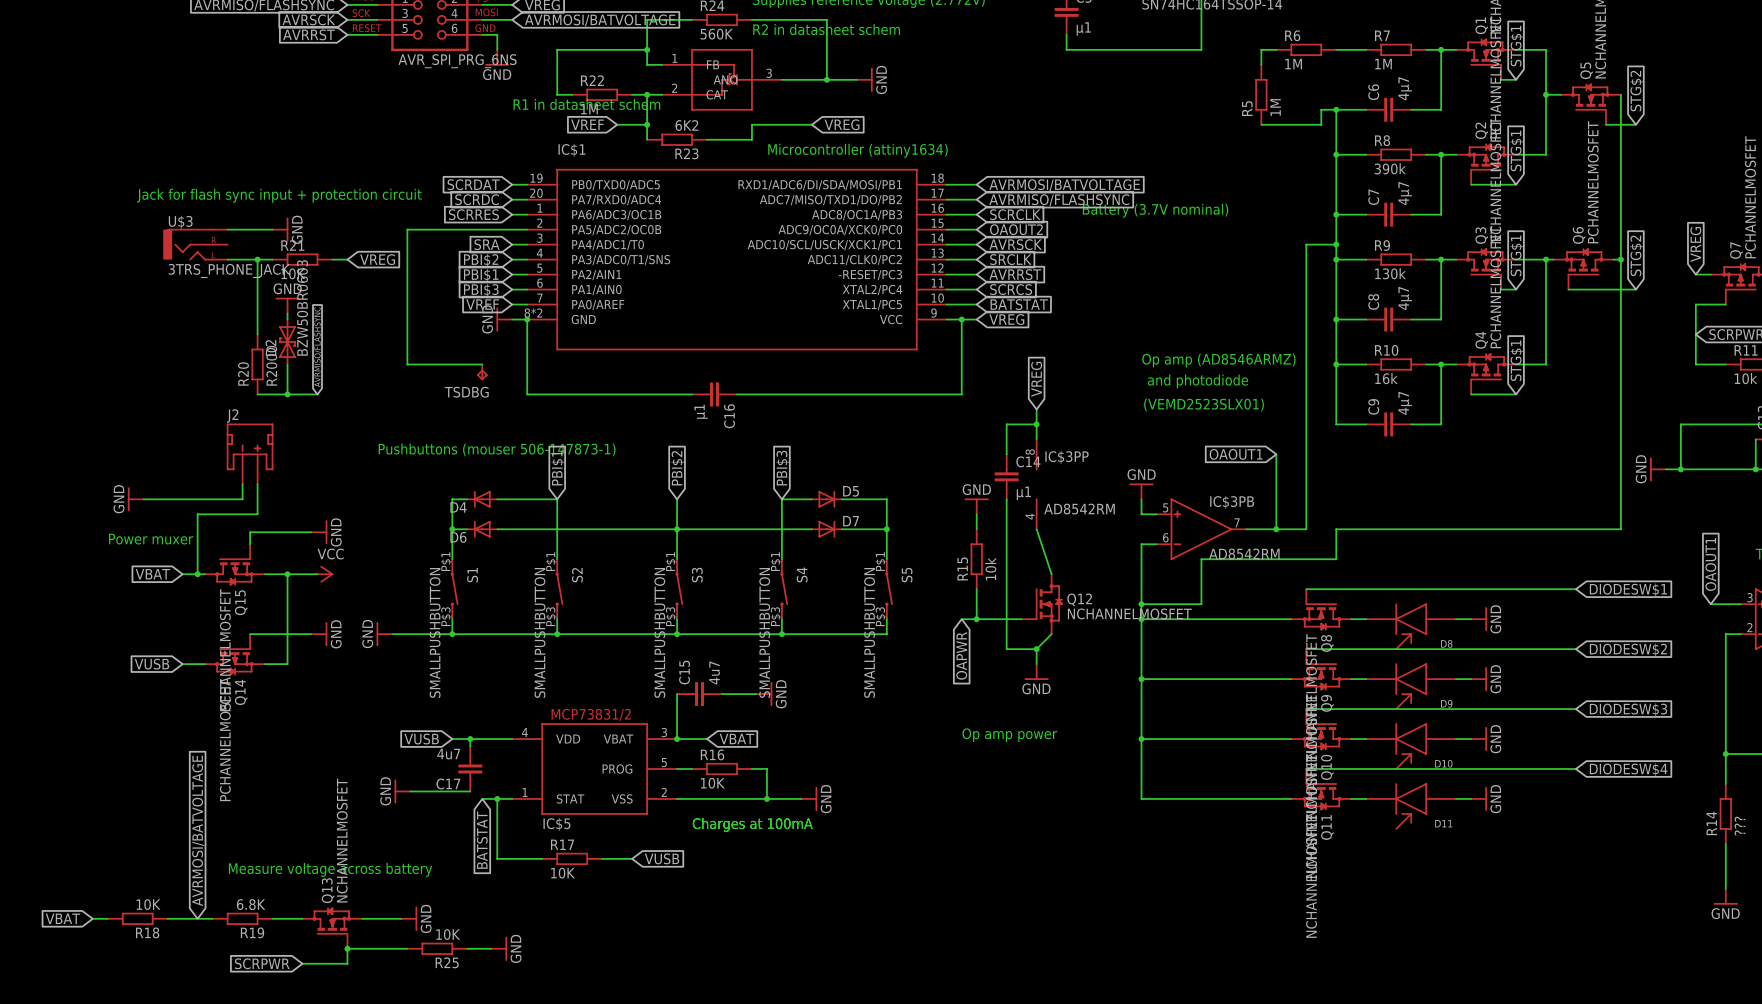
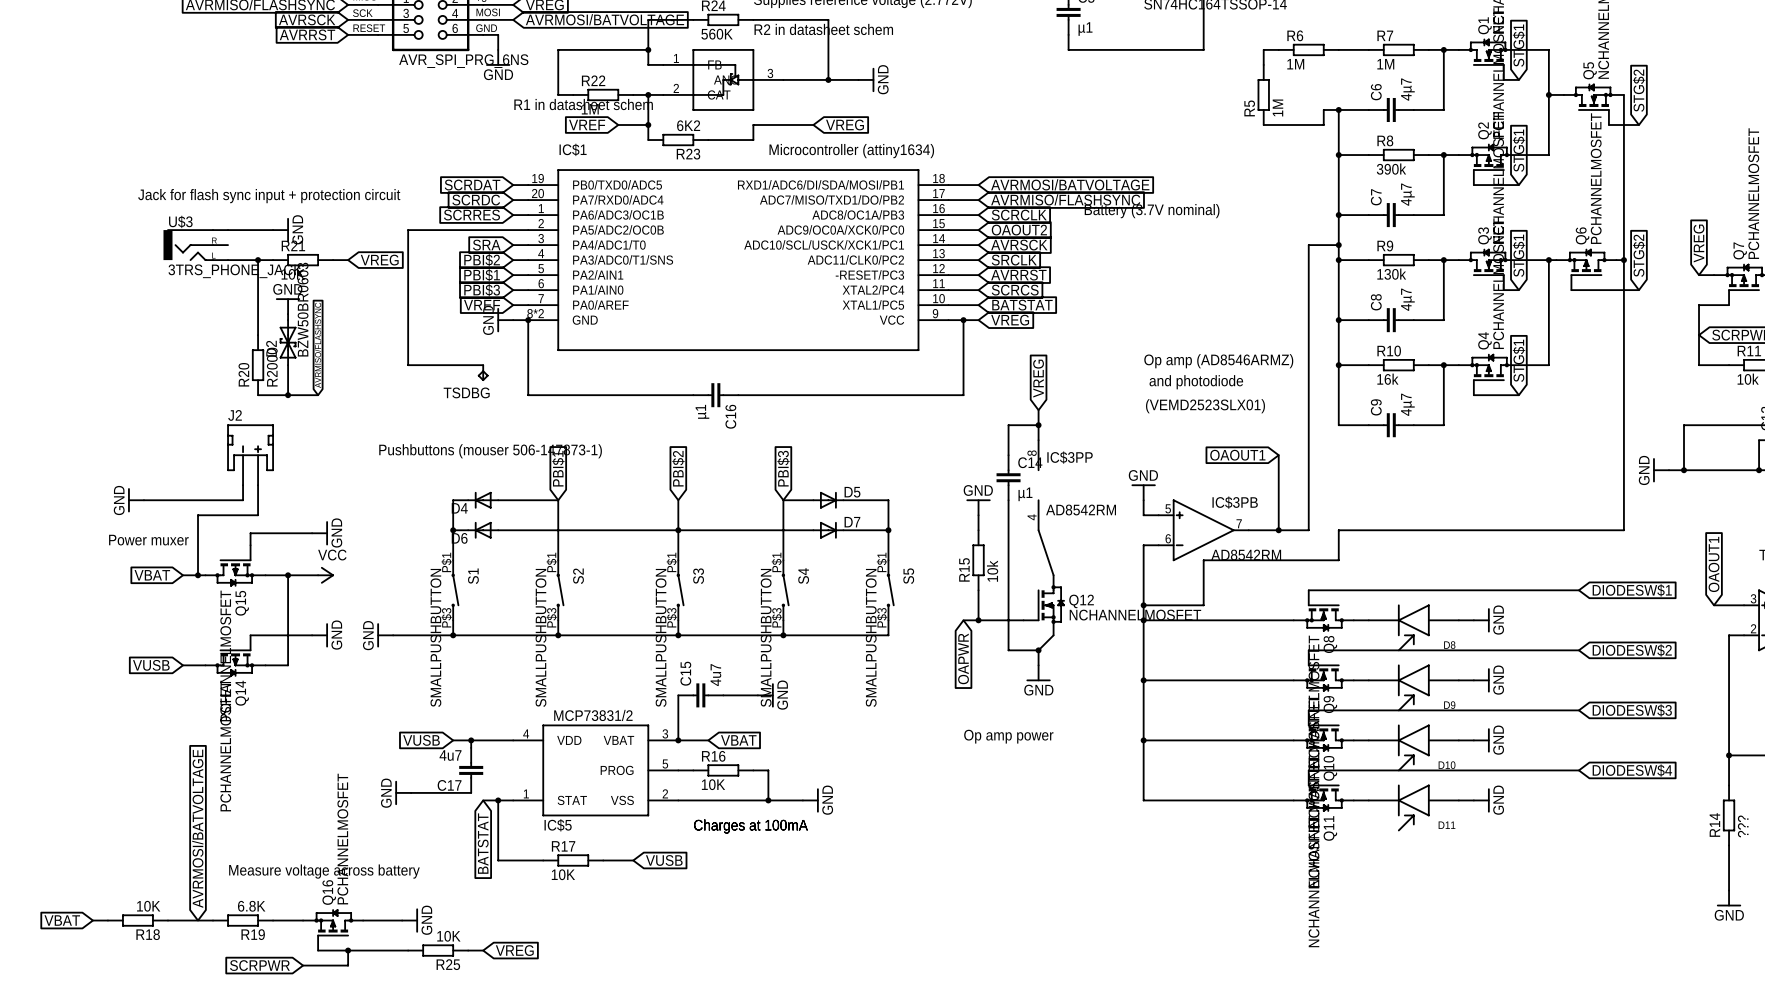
Q13: NCHANNELMOSFET (332, 928) -> none
Q16: none -> PCHANNELMOSFET (333, 930)
wire: none -> (318, 950) (348, 950)
wire: (482, 948) (491, 948) -> none
power symbol: GND (499, 948) -> none
global label: none -> VREG (514, 950)

